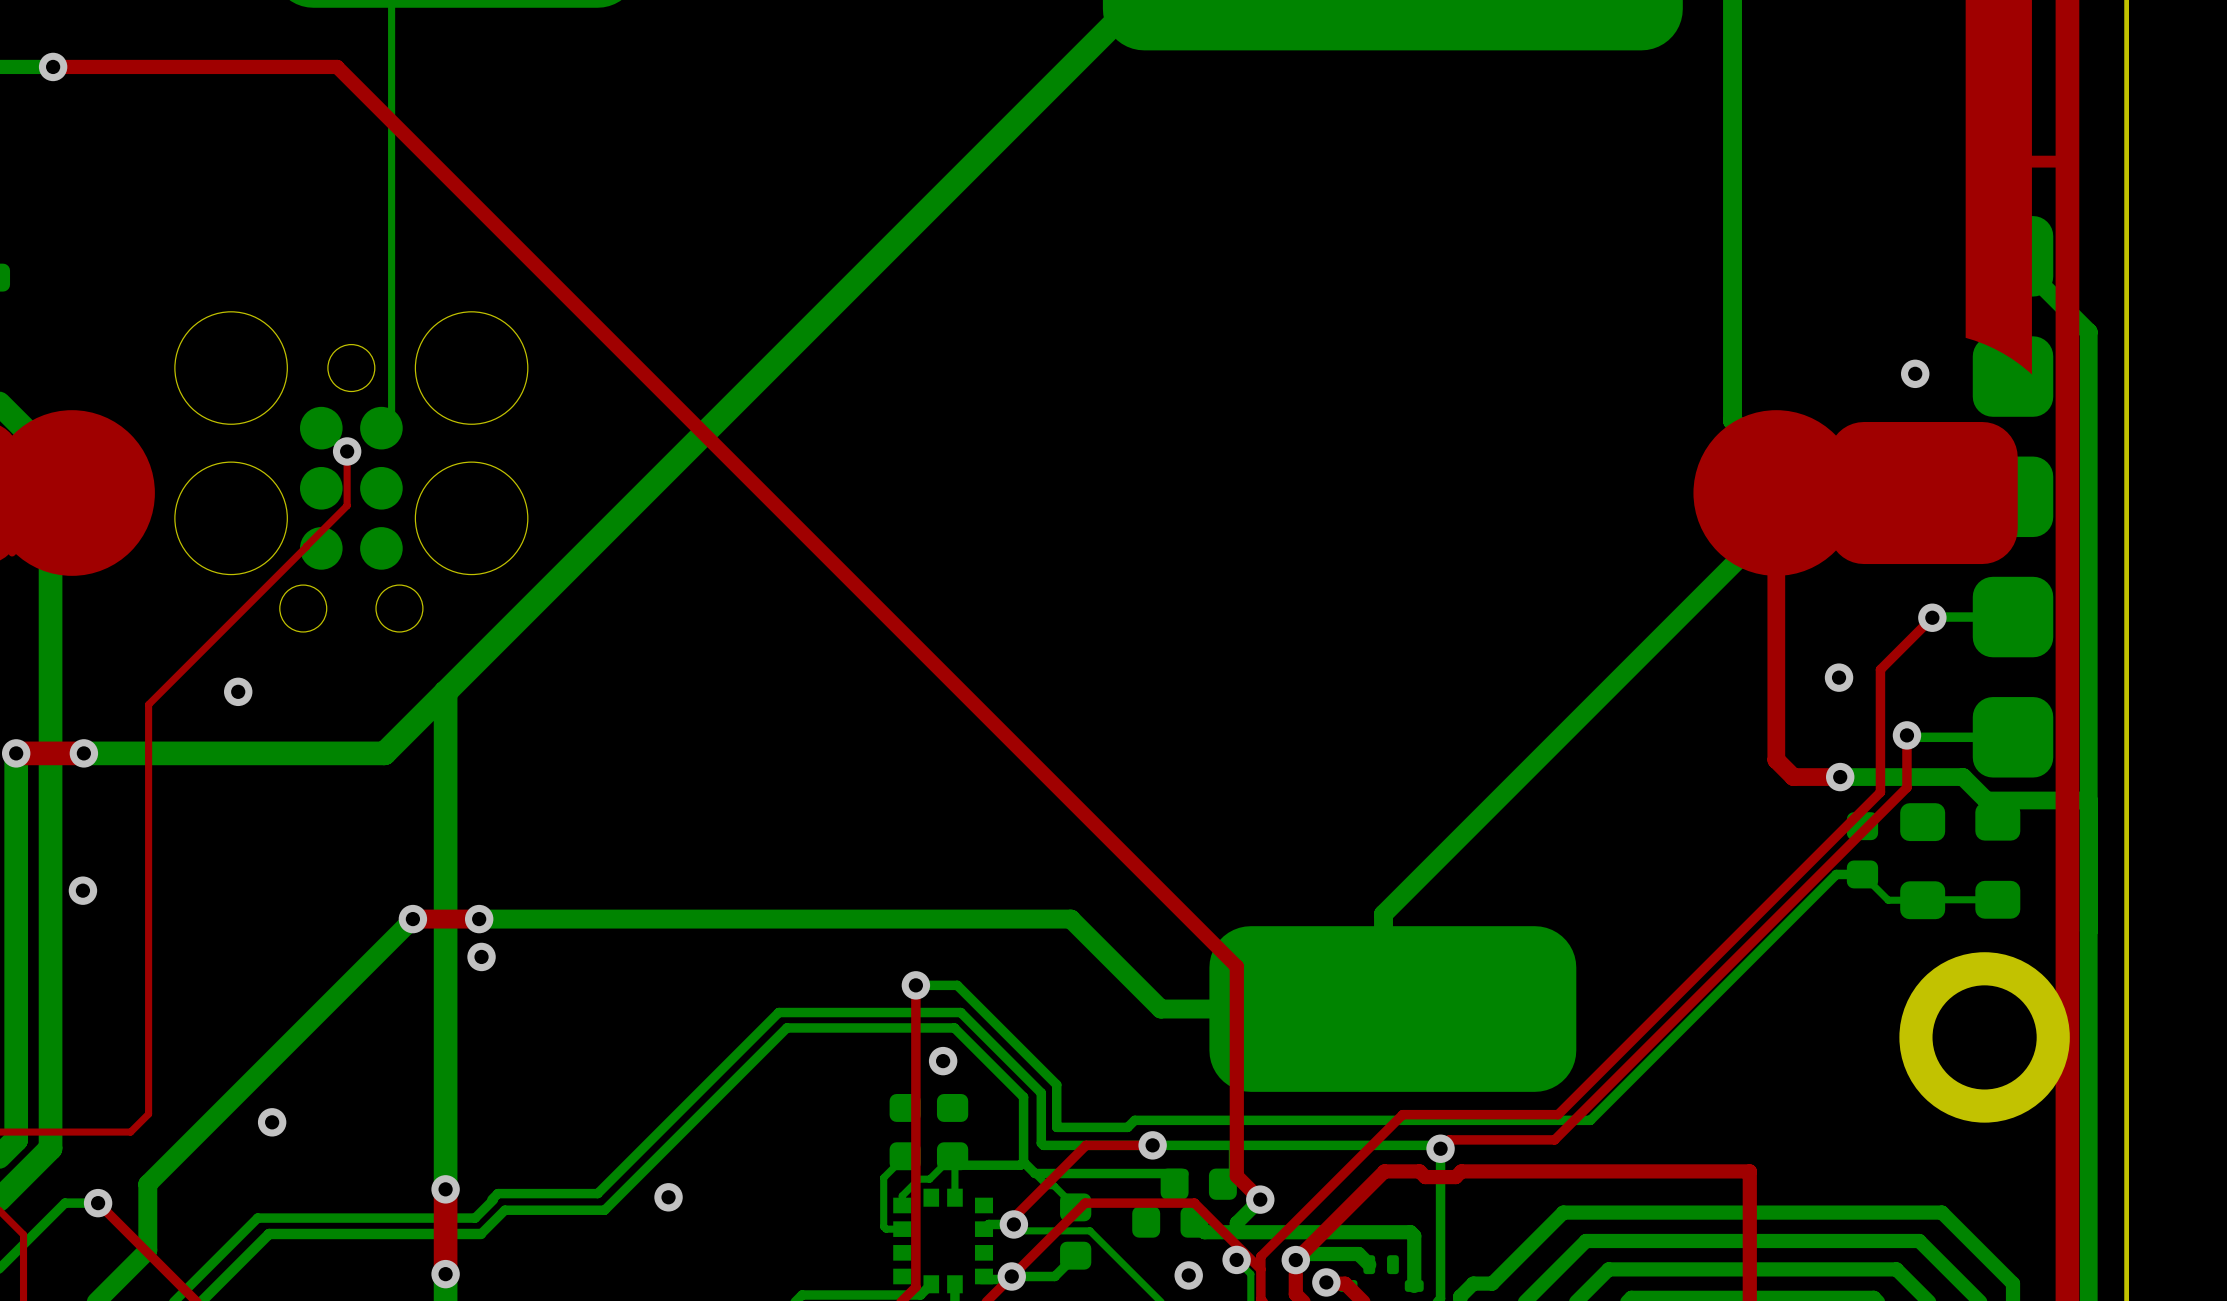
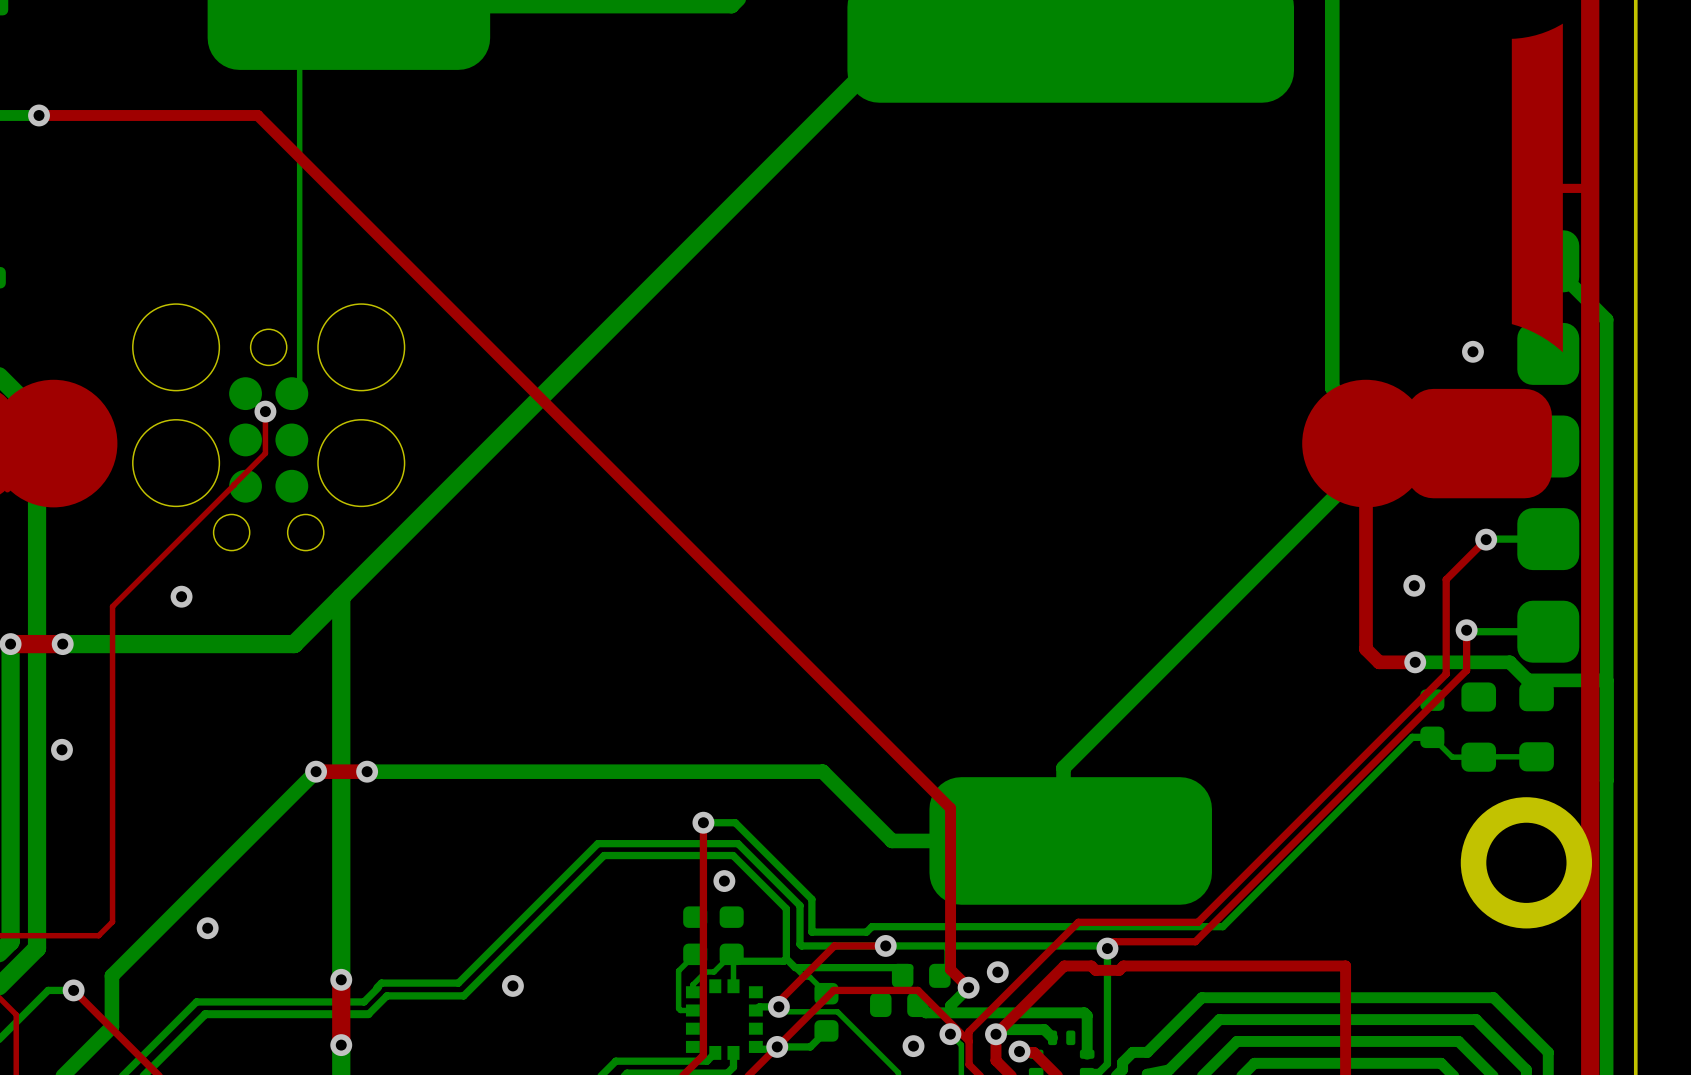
via: (481, 956) -> none
via: none -> (997, 972)

